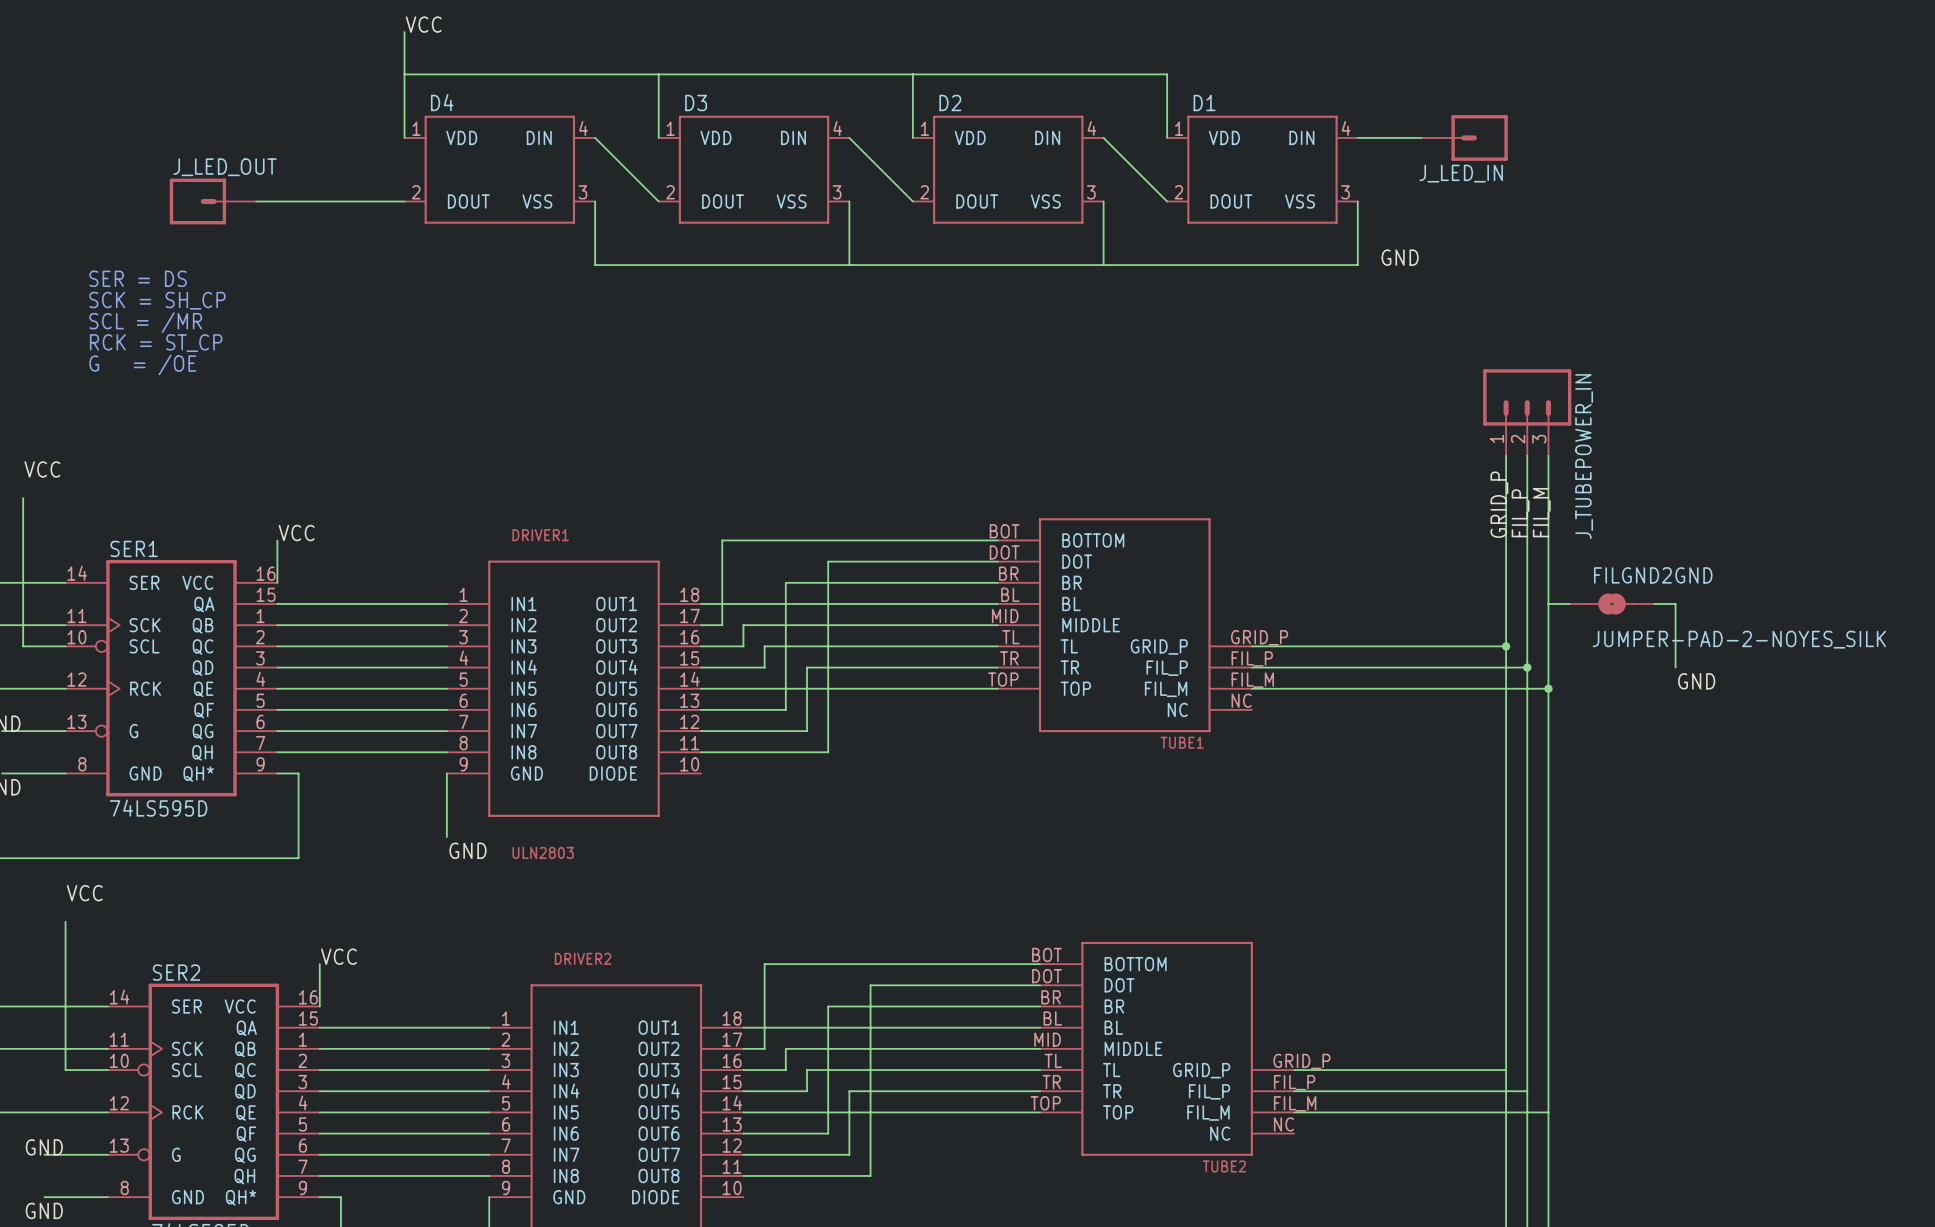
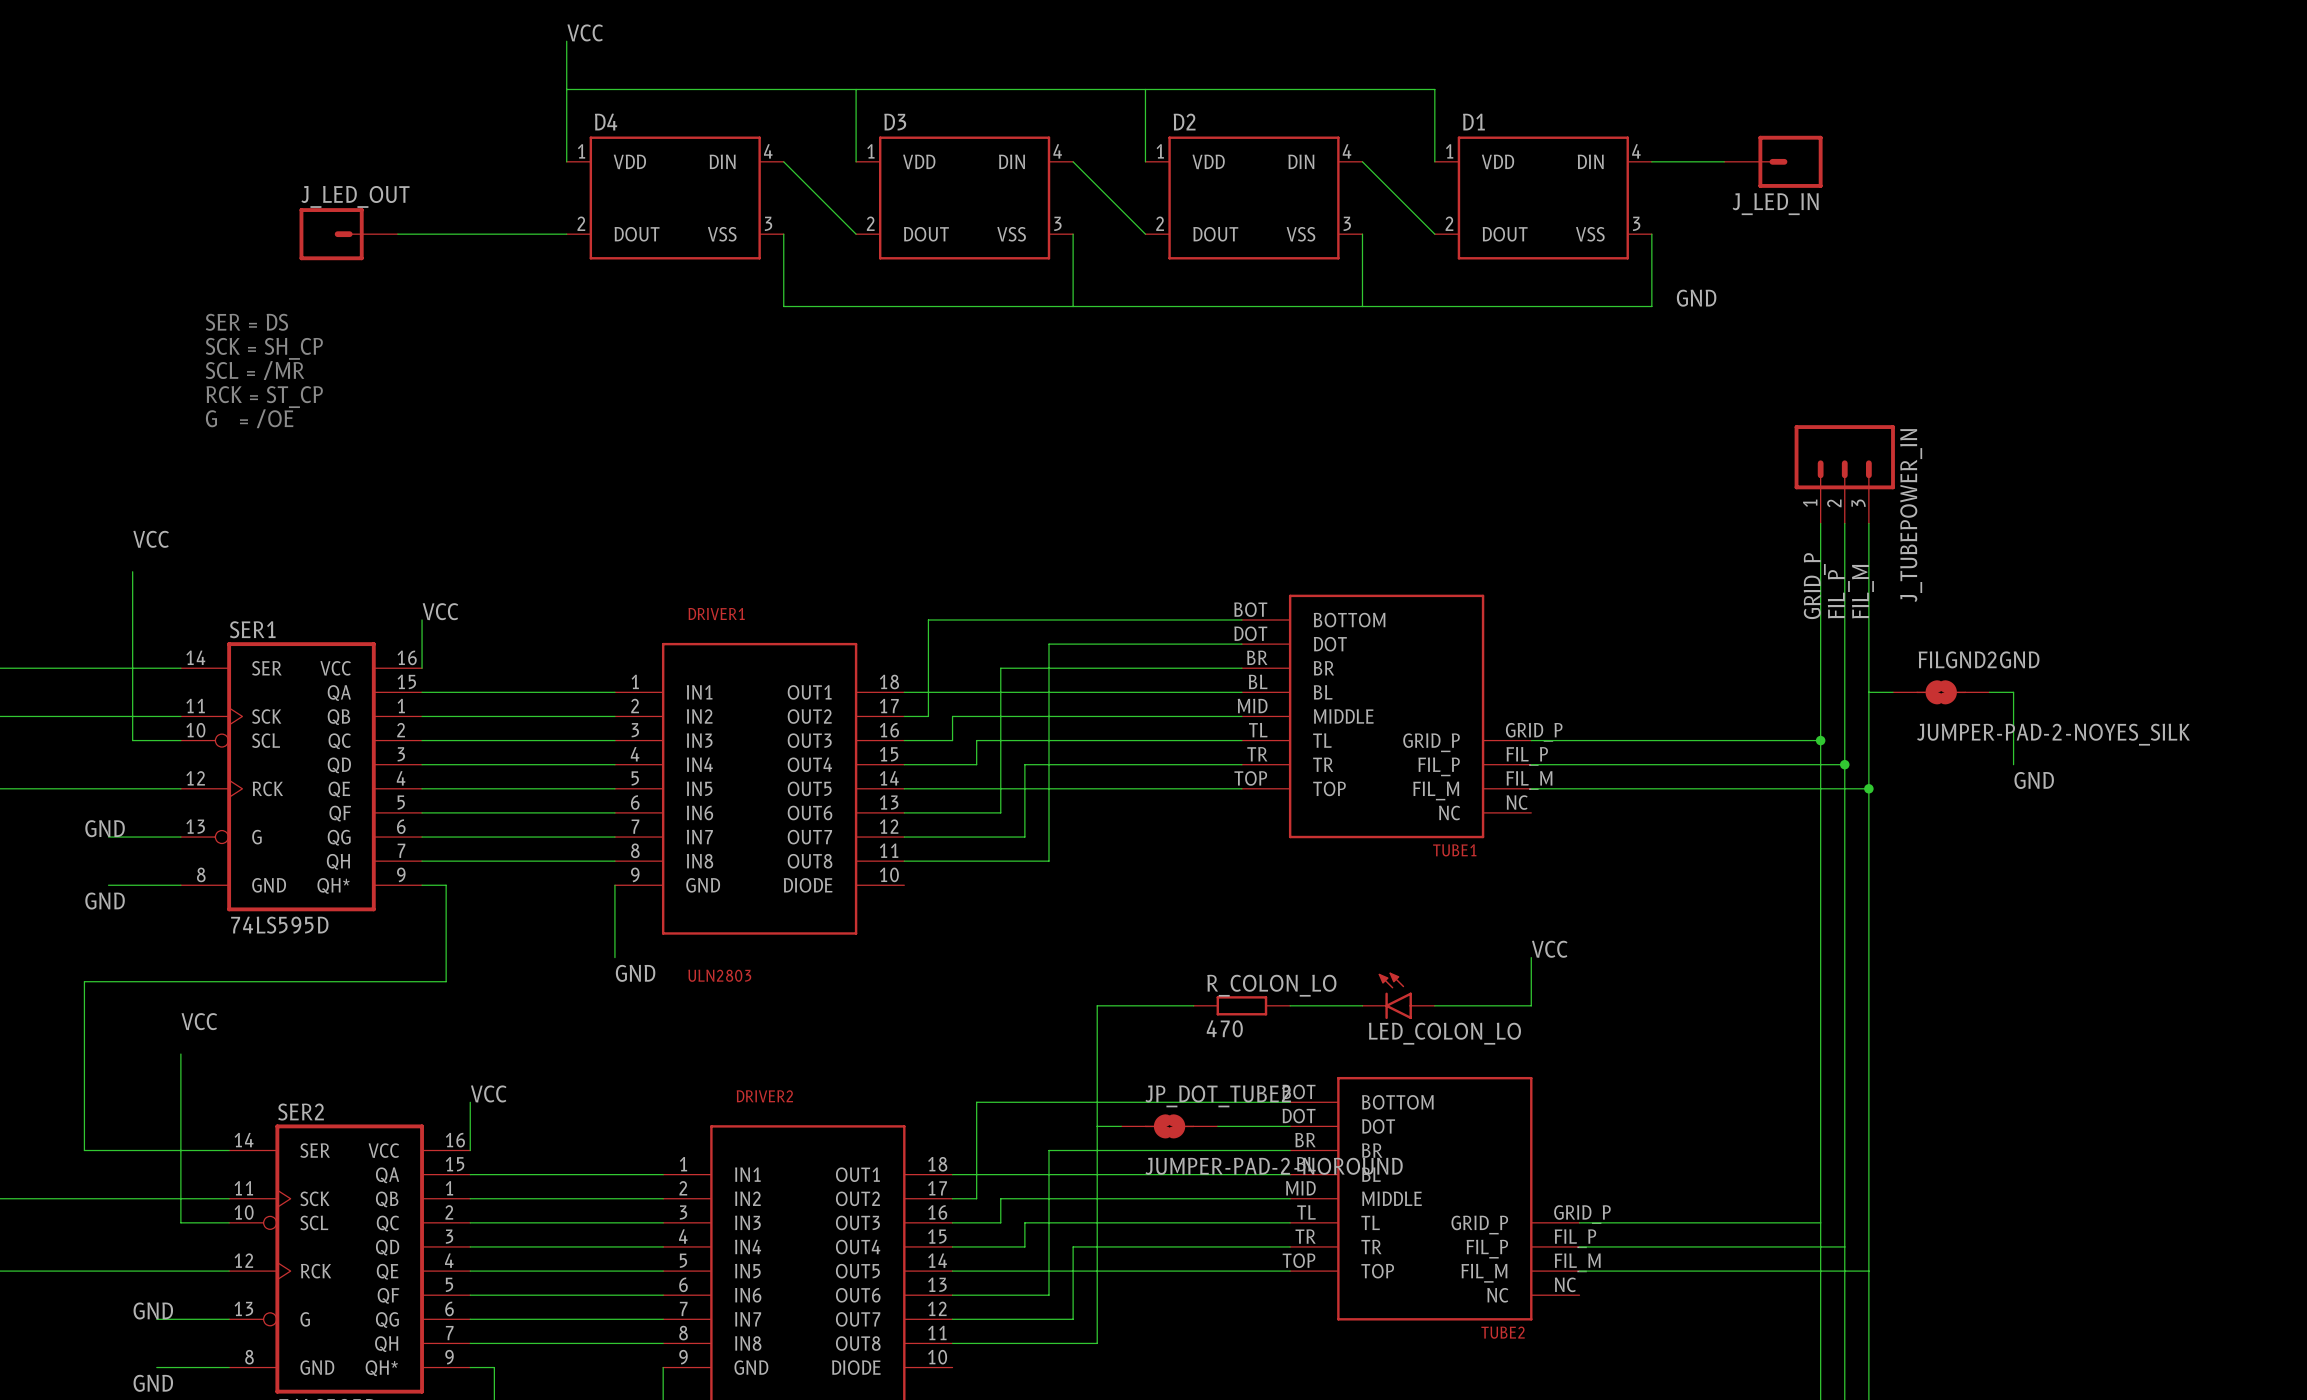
label: none -> VCC (1549, 949)
wire: none -> (1531, 957) (1531, 1005) (1434, 1005)
LED_COLON_LO: none -> (1398, 995)
wire: none -> (1193, 1005) (1097, 1005) (1097, 1126)
R_COLON_LO: none -> 470 (1241, 1005)
wire: none -> (1290, 1005) (1362, 1005)
JP_DOT_TUBE2: none -> JUMPER-PAD-2-NOROUND (1169, 1126)

